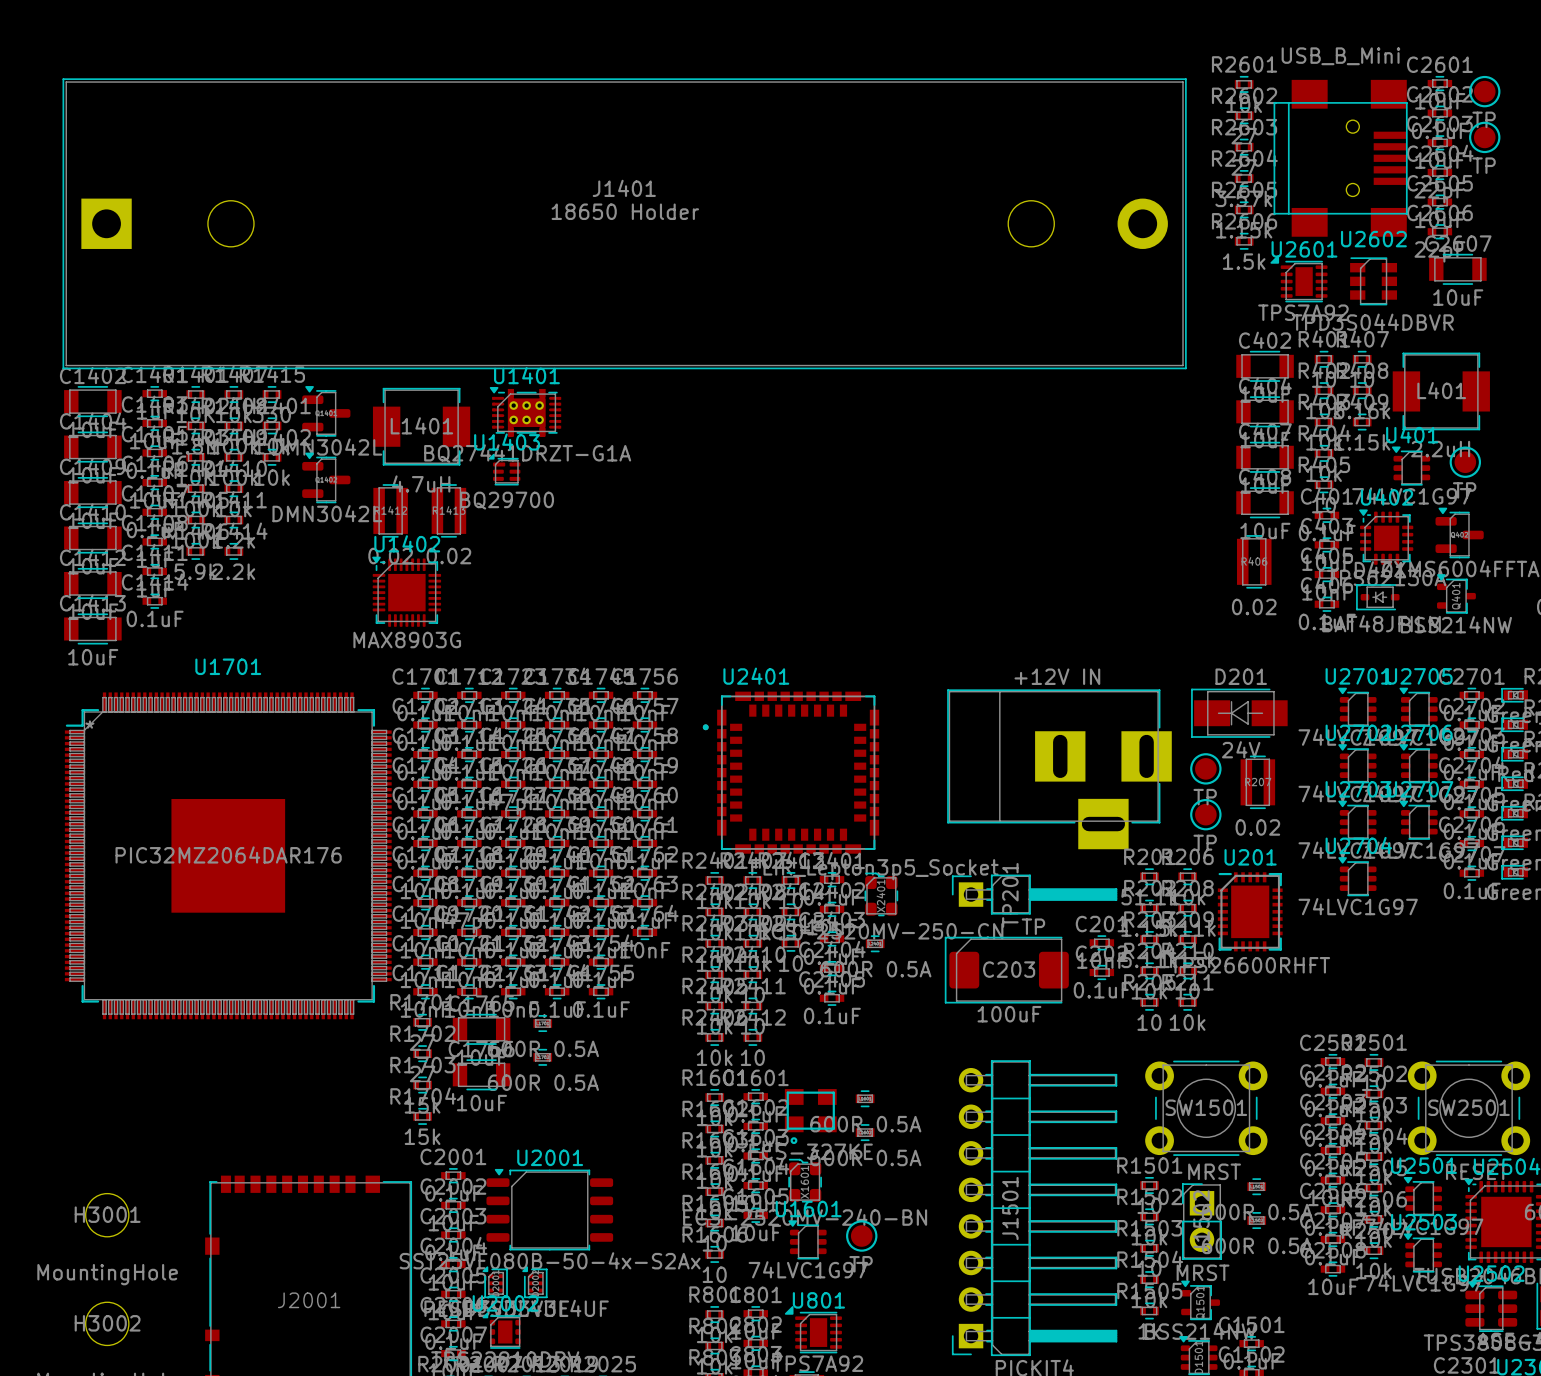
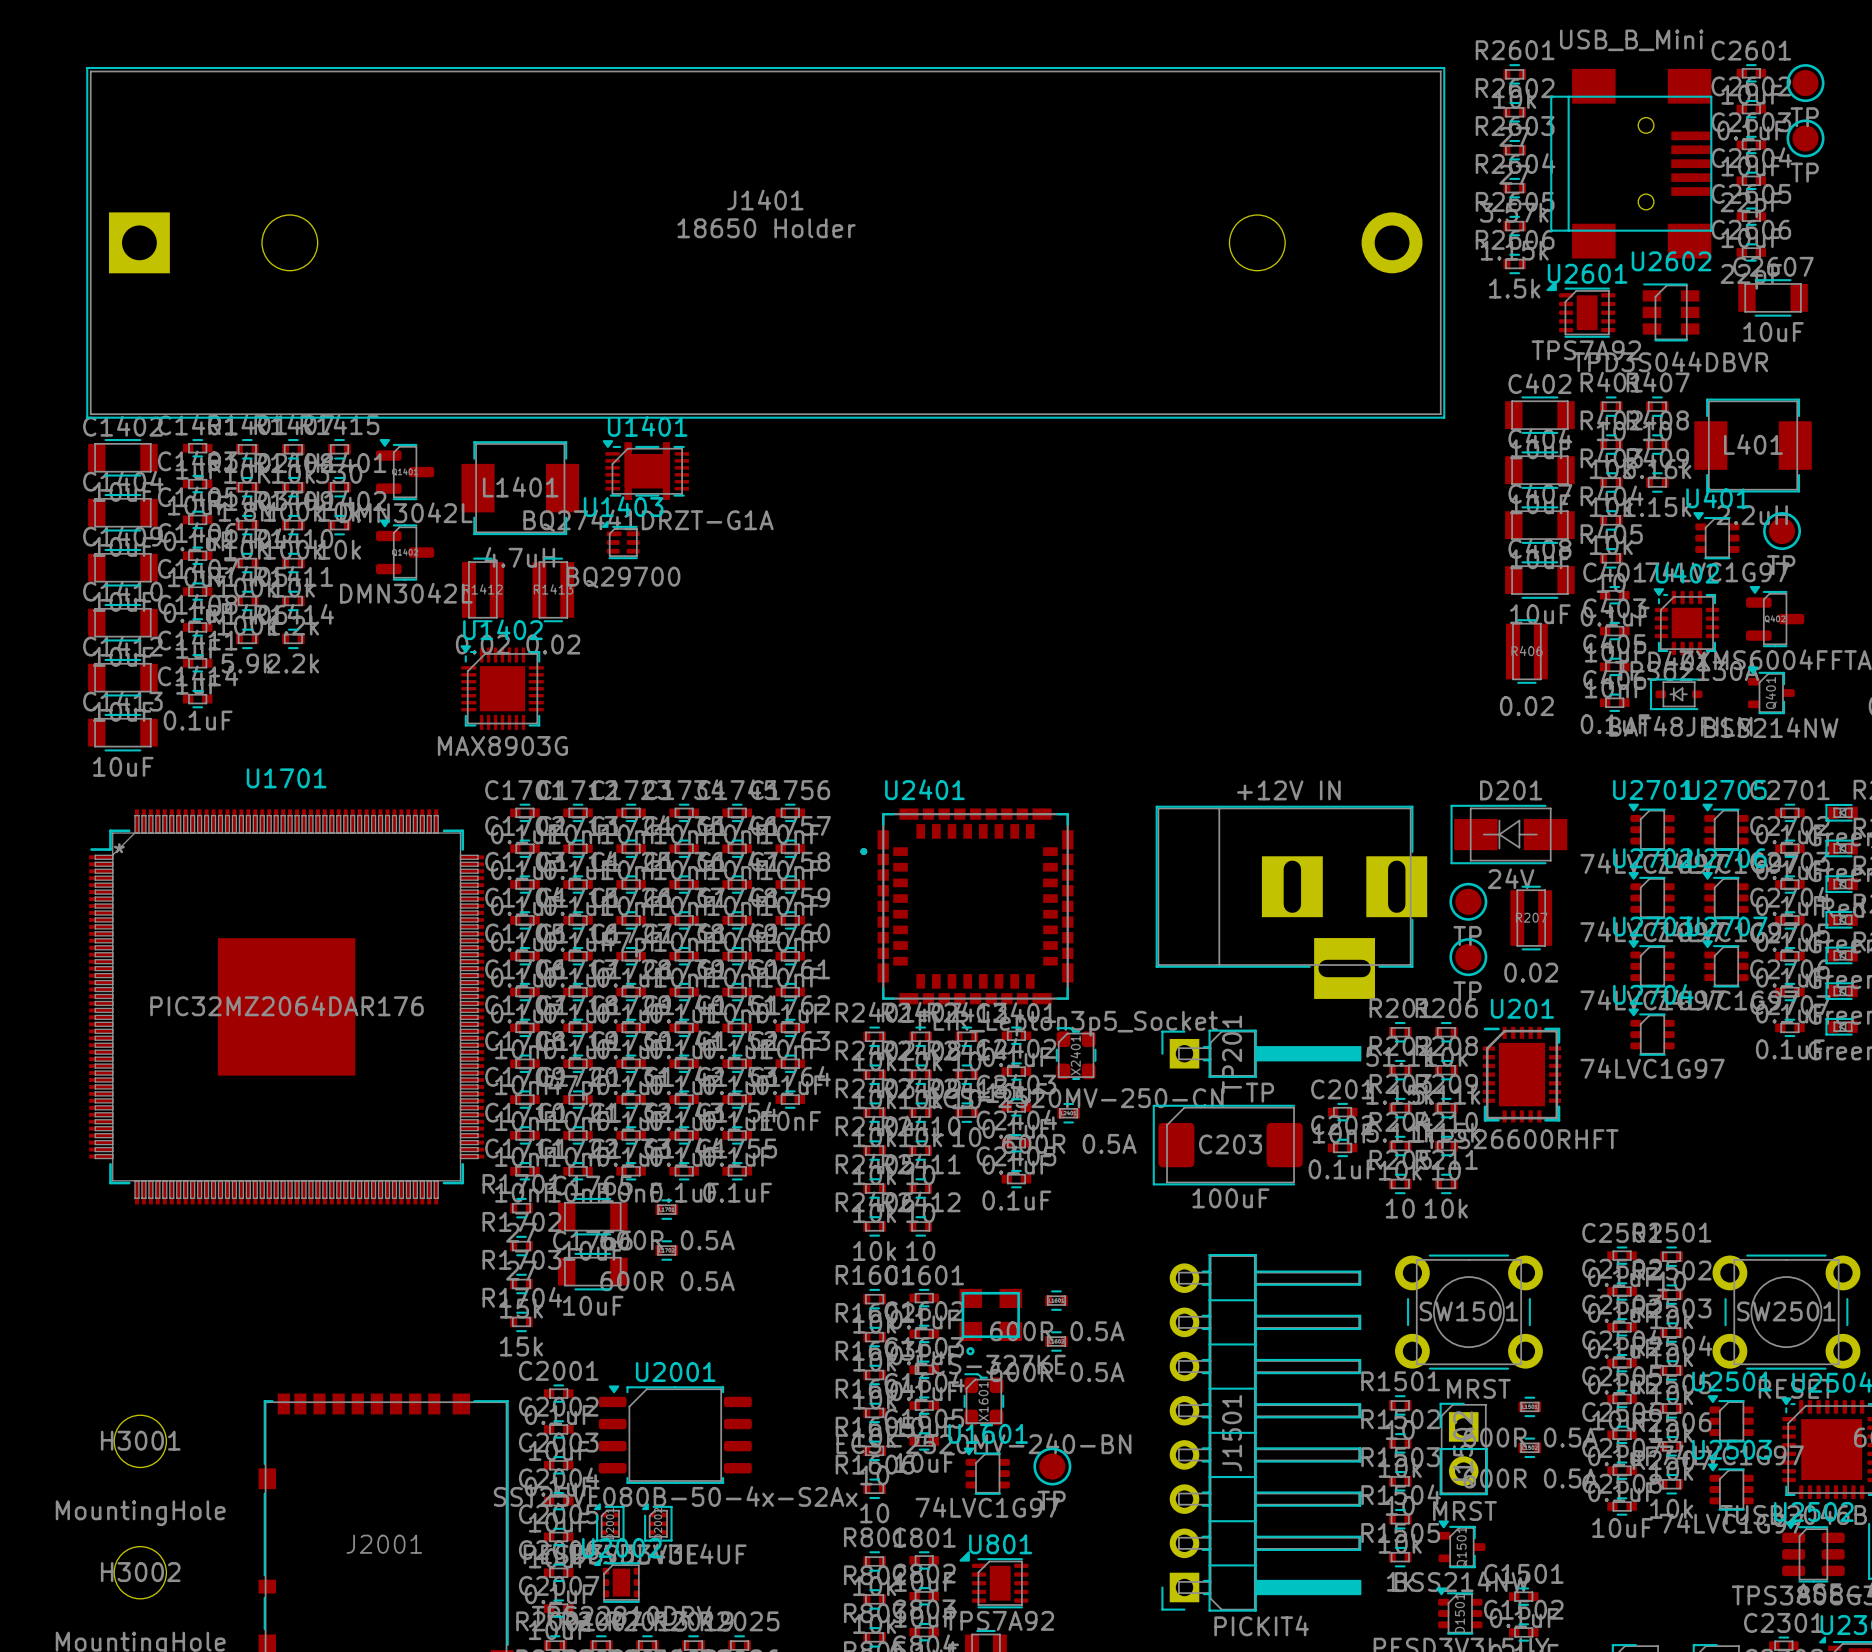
U1401 footprint: [489, 386, 562, 437] -> [602, 440, 690, 501]

